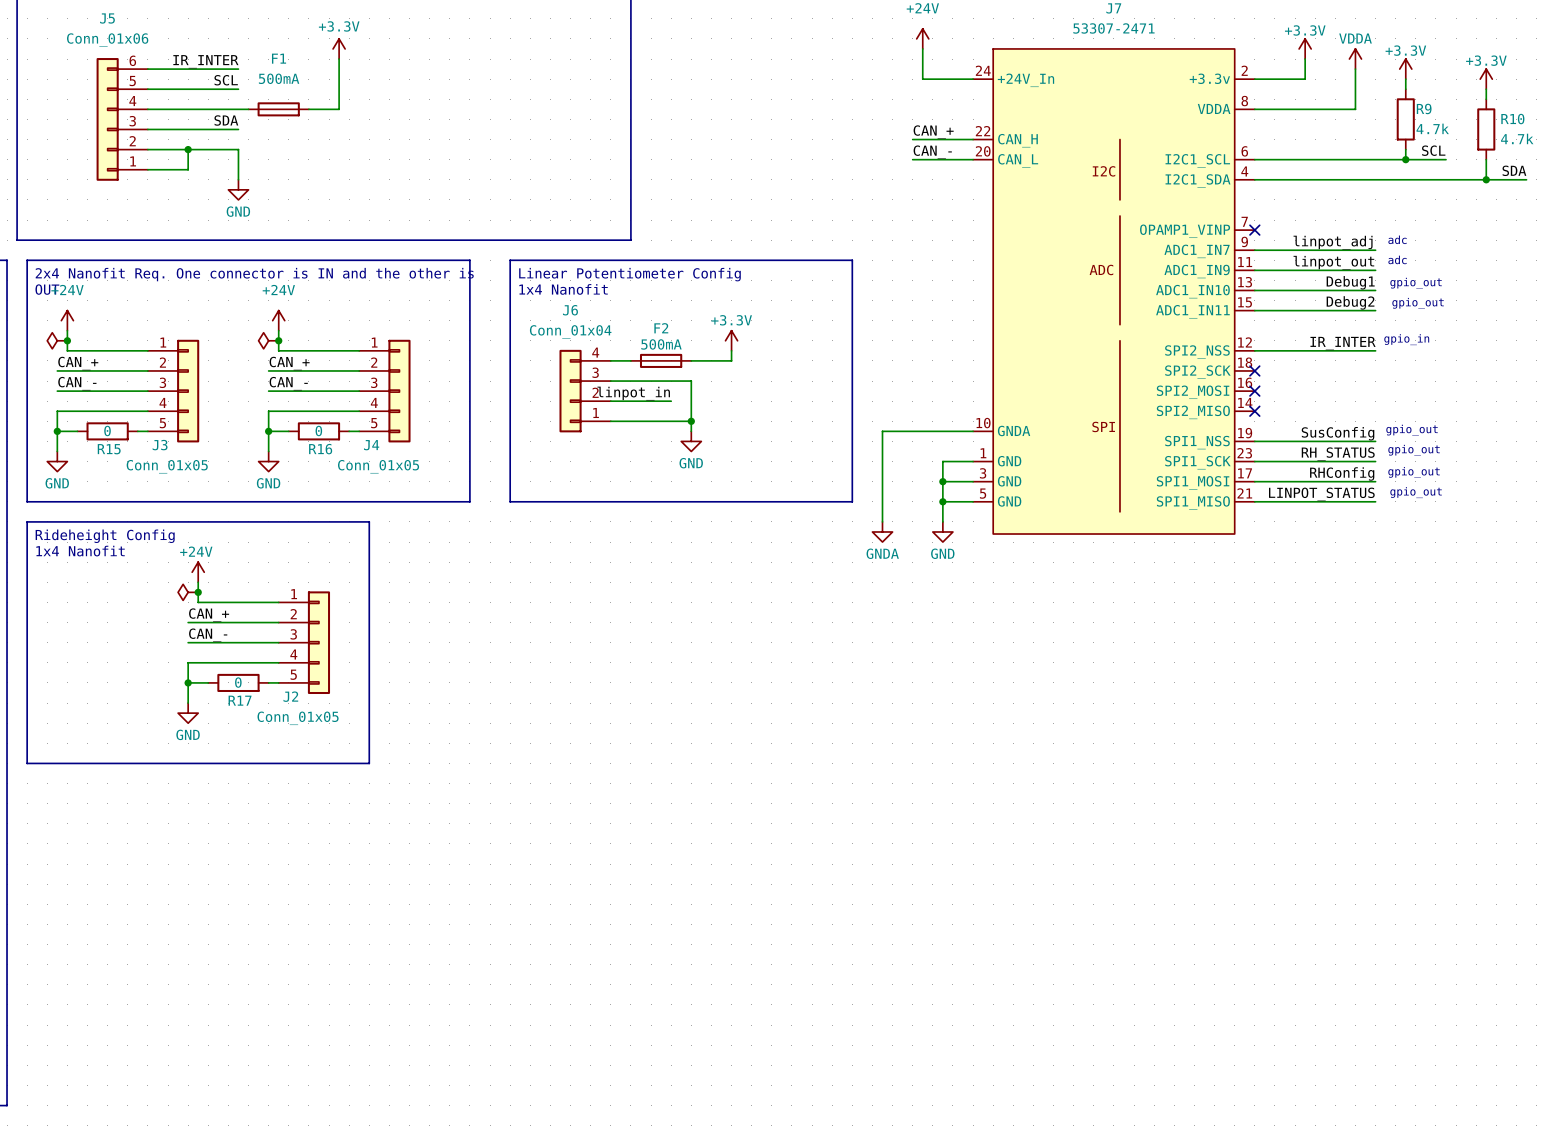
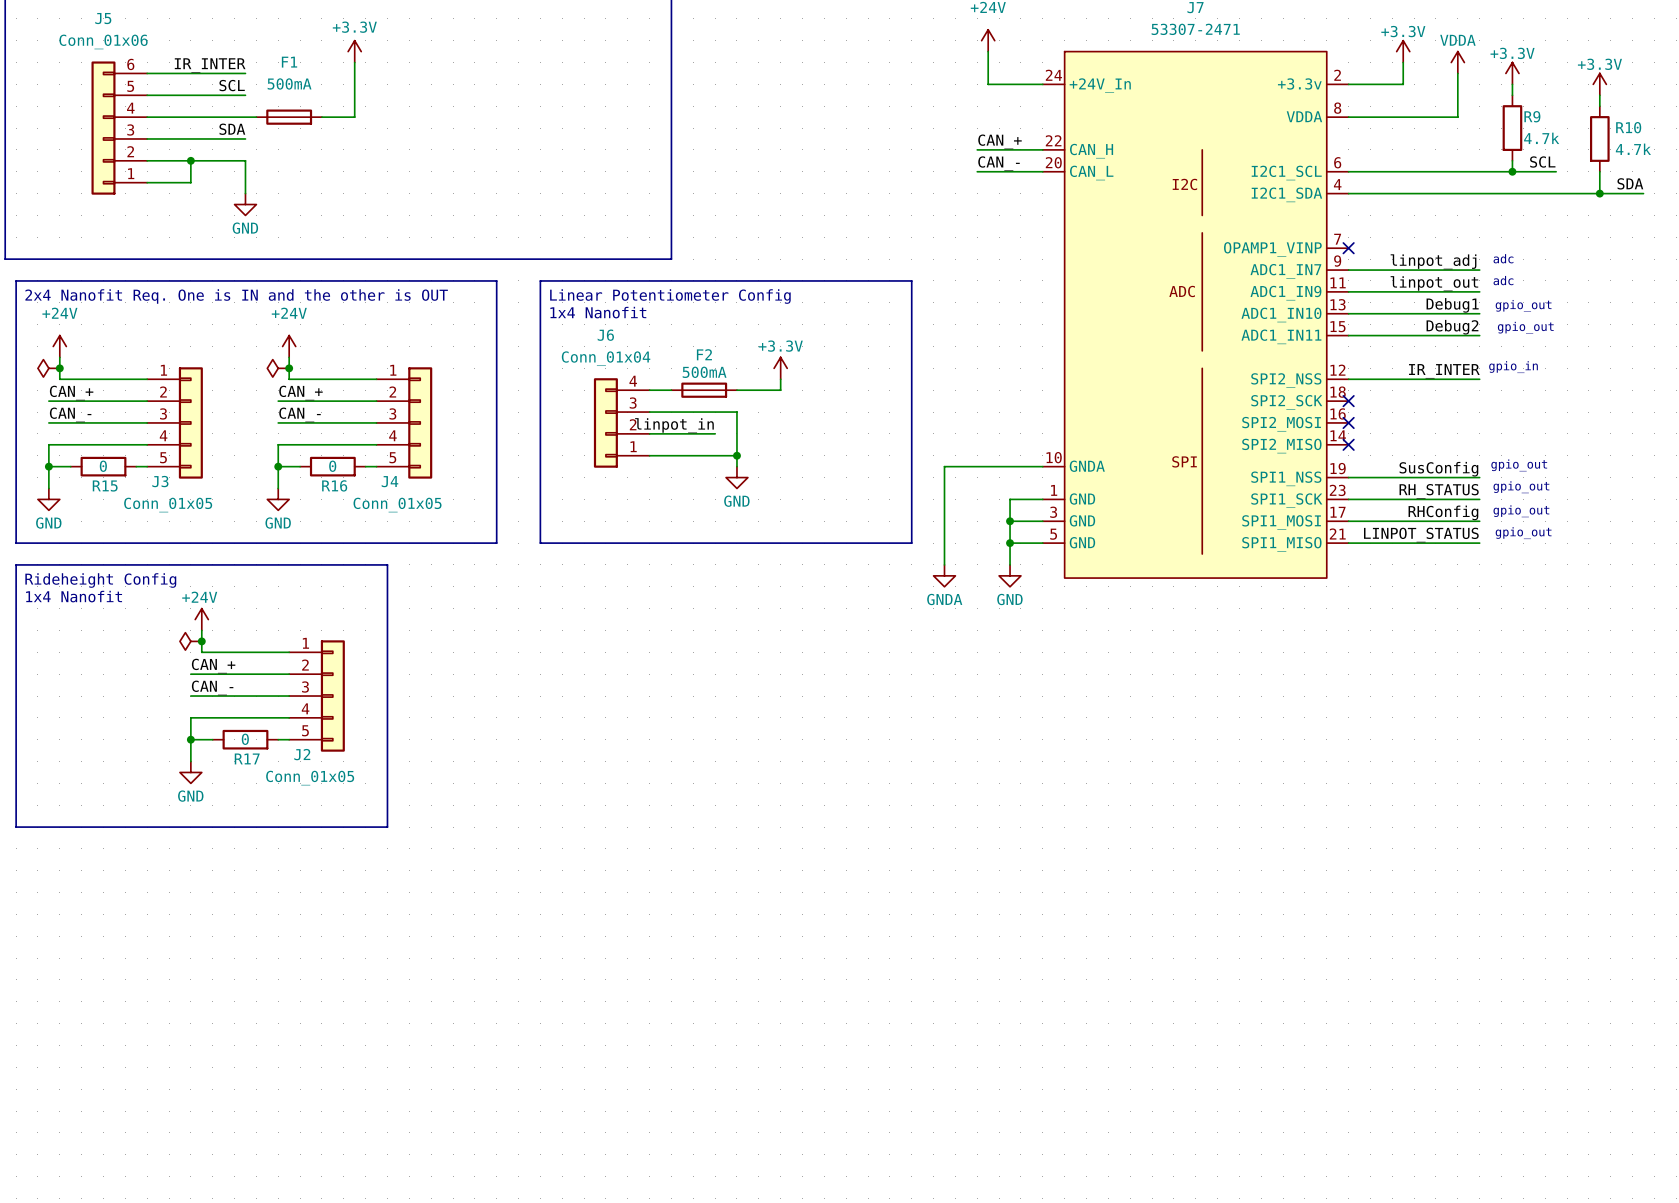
text: 2x4 Nanofit Req. One connector is IN and the other is (254, 274) -> 2x4 Nanofit Req. One is IN and the other is OUT (236, 296)
text: OUT (47, 289) -> none

